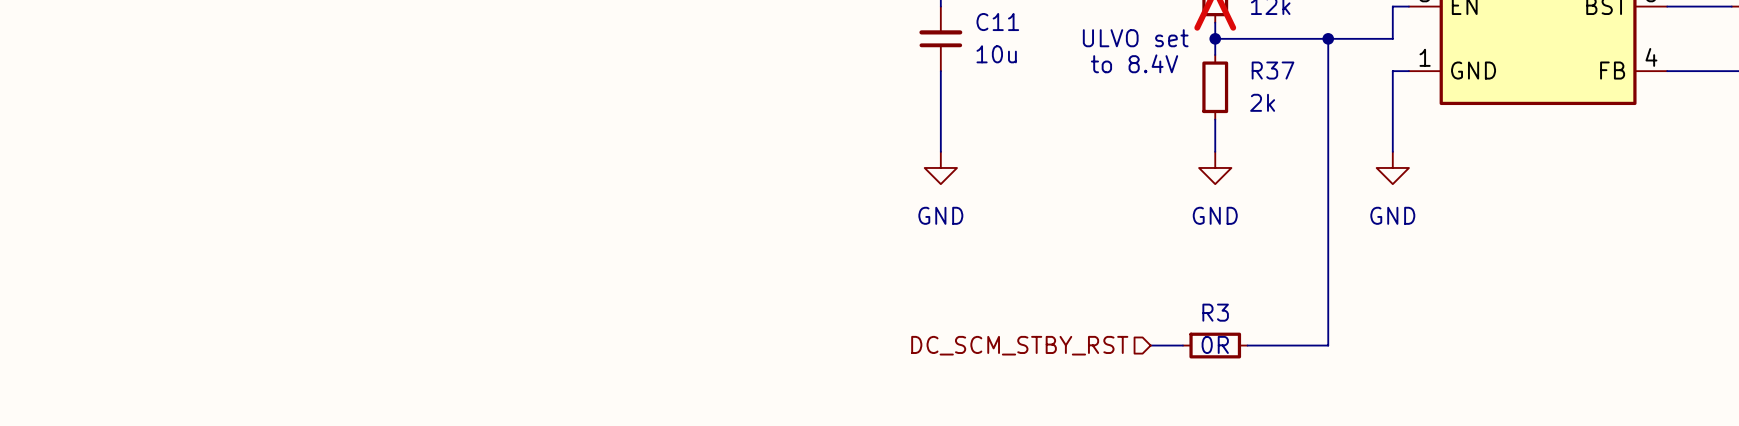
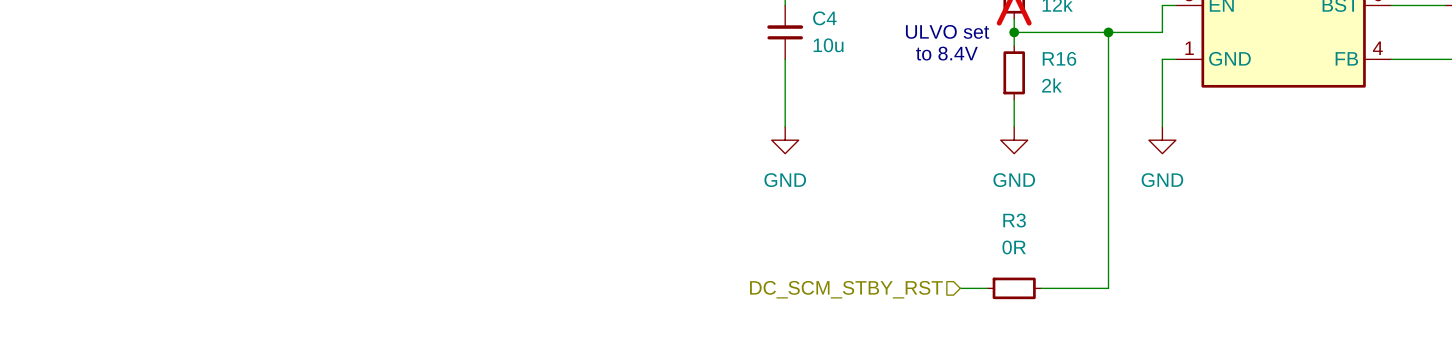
C11 name: C11 (997, 22) -> C4 (824, 18)
R37 name: R37 (1273, 70) -> R16 (1059, 58)
R3 name position: R3 (1215, 312) -> R3 (1014, 220)
R3 text position: 0R (1215, 344) -> 0R (1014, 247)

